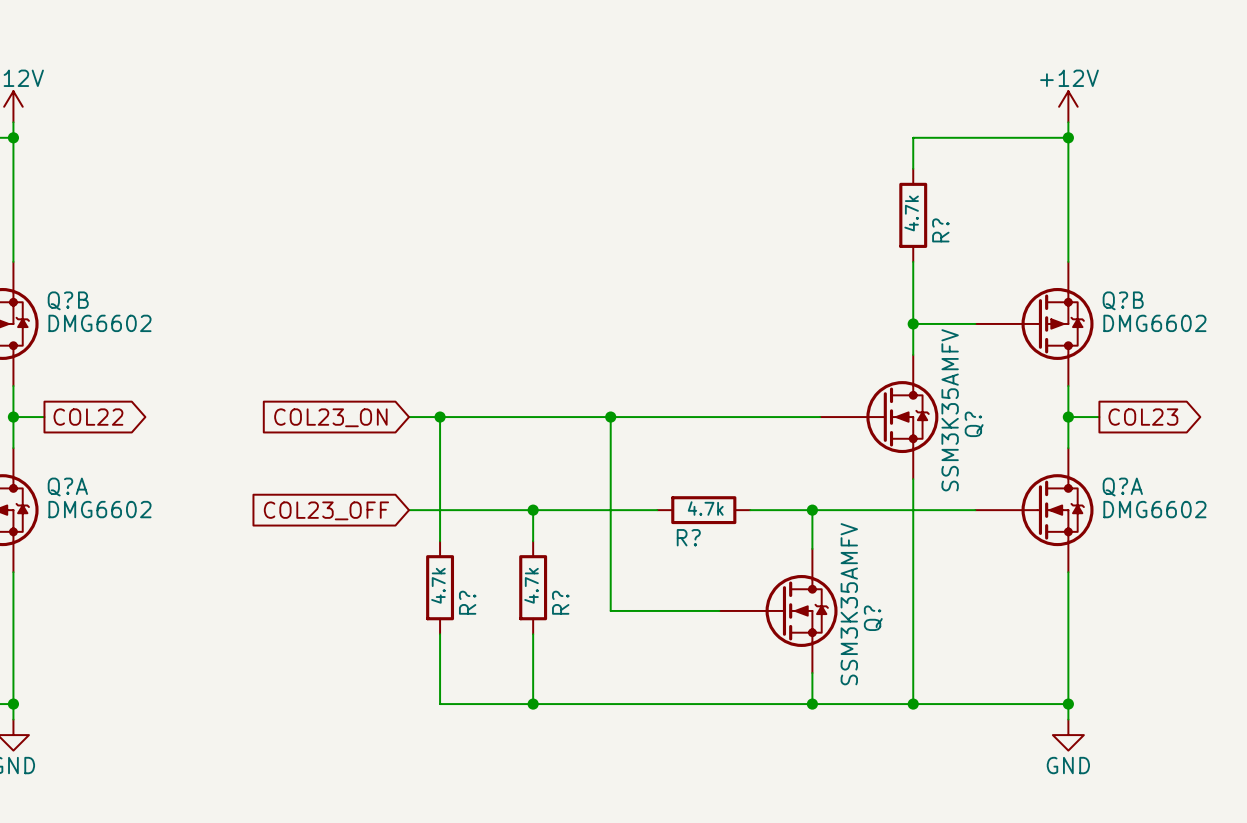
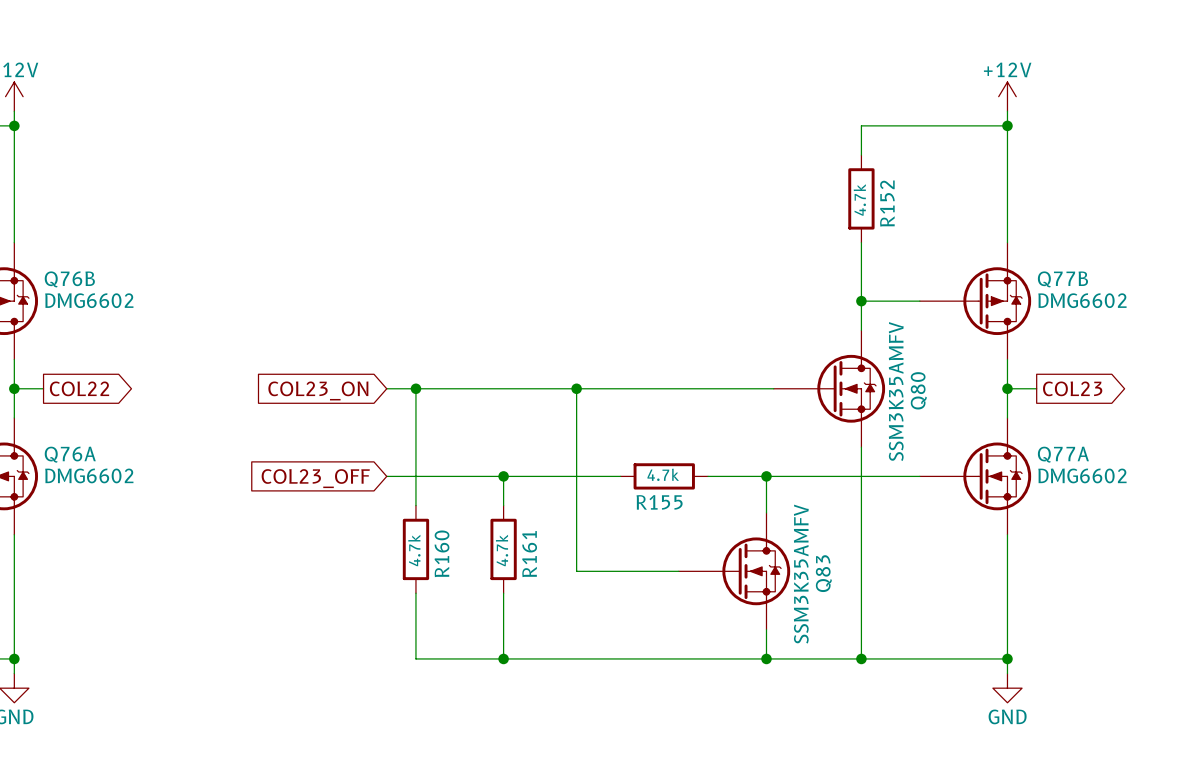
R? name: R? (940, 230) -> R152 (887, 203)
Q?B name: Q?B (68, 300) -> Q76B (69, 279)
Q?B name: Q?B (1123, 300) -> Q77B (1062, 279)
Q? name: Q? (974, 424) -> Q80 (918, 390)
Q?A name: Q?A (67, 487) -> Q76A (70, 454)
Q?A name: Q?A (1122, 487) -> Q77A (1063, 454)
R? name: R? (688, 537) -> R155 (659, 502)
R? name: R? (467, 602) -> R160 (442, 553)
R? name: R? (560, 602) -> R161 (529, 554)
Q? name: Q? (873, 618) -> Q83 (823, 573)

